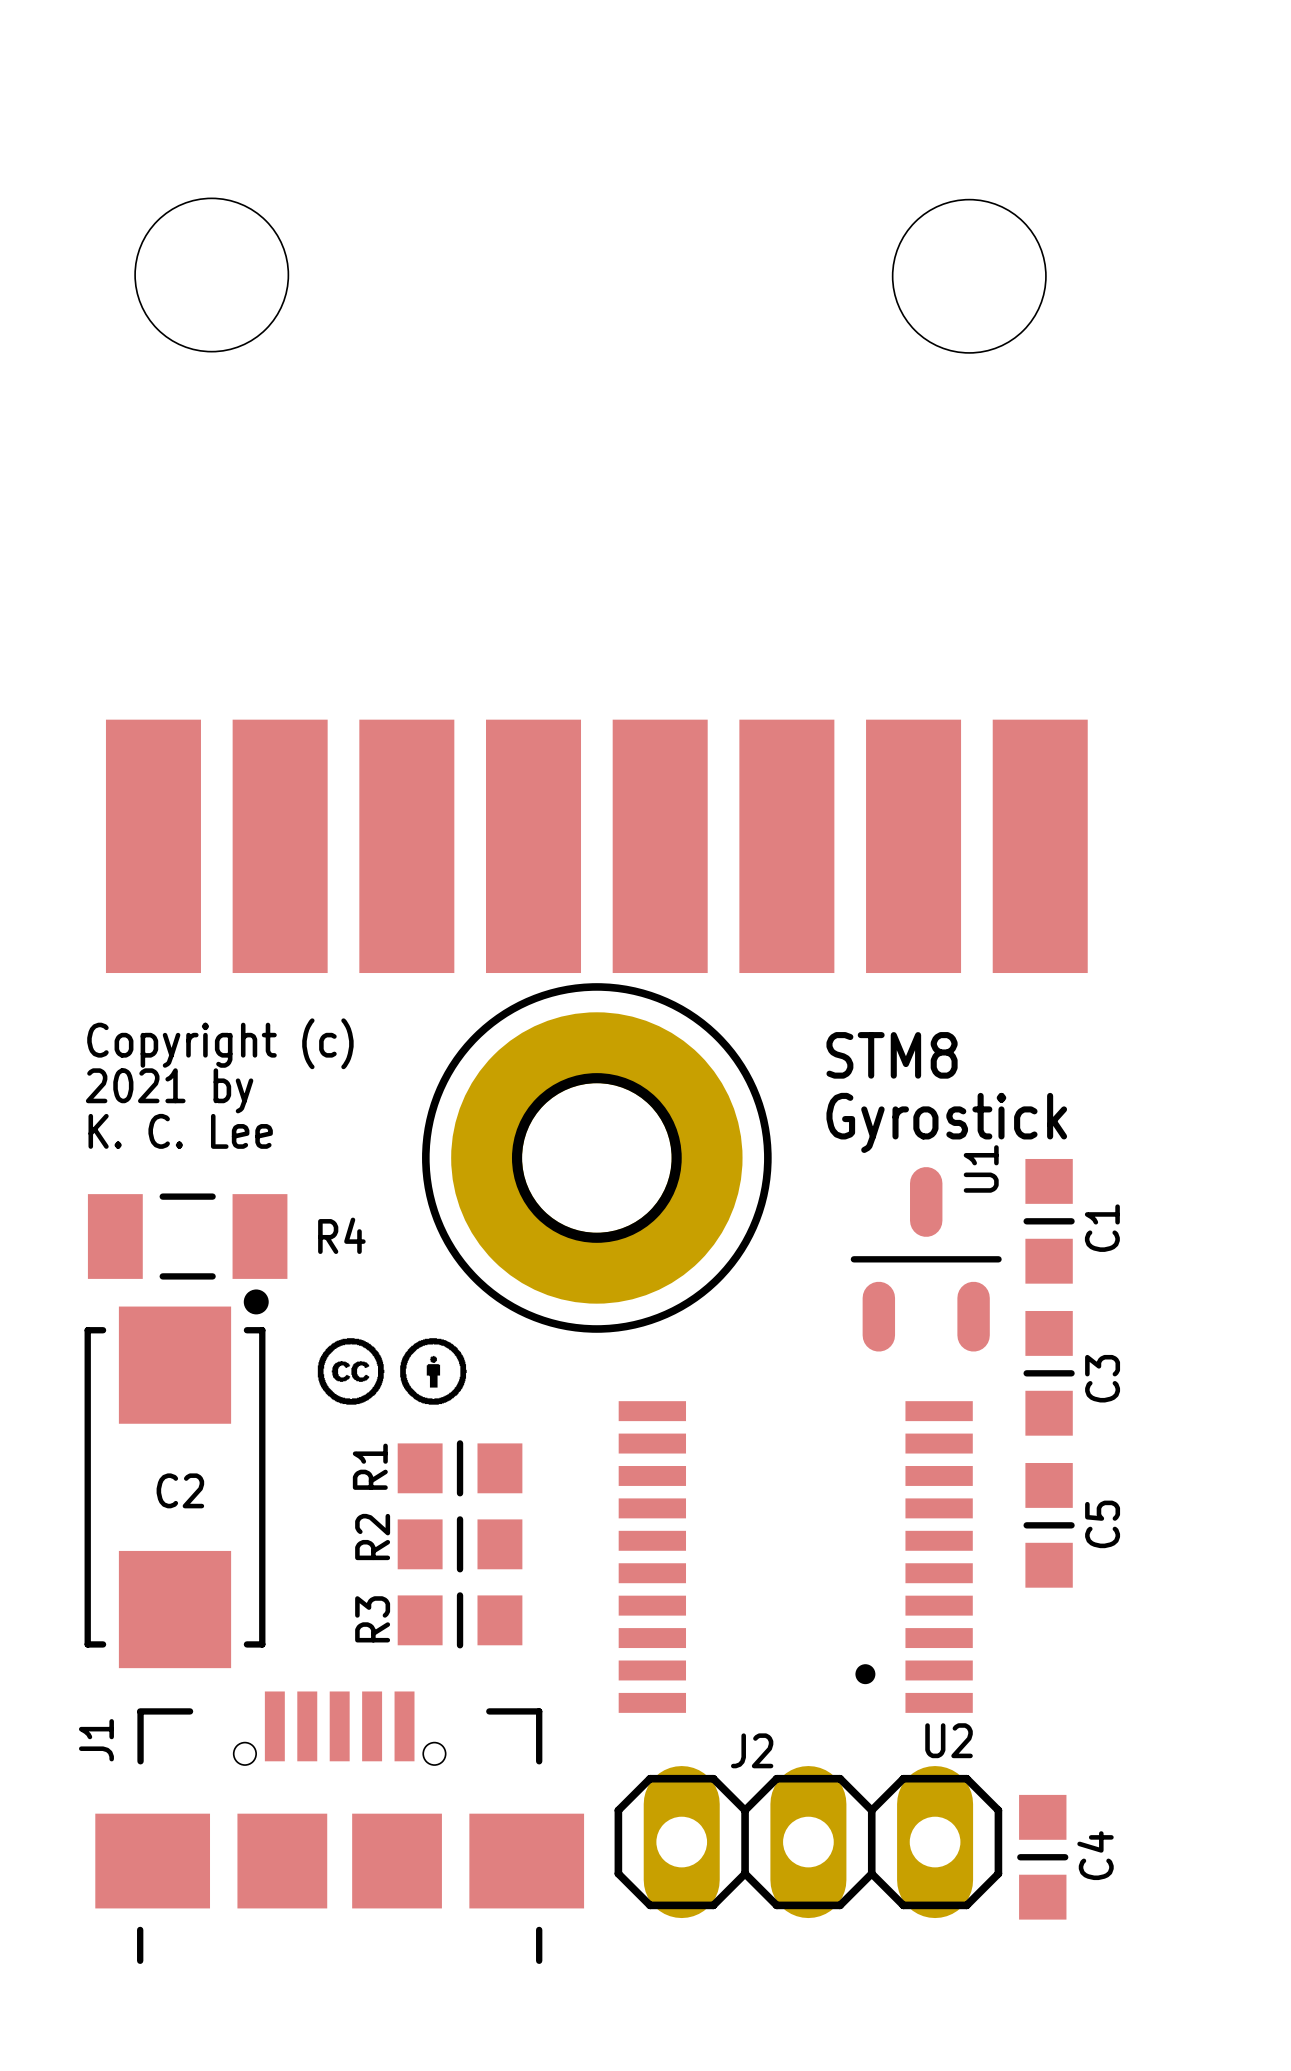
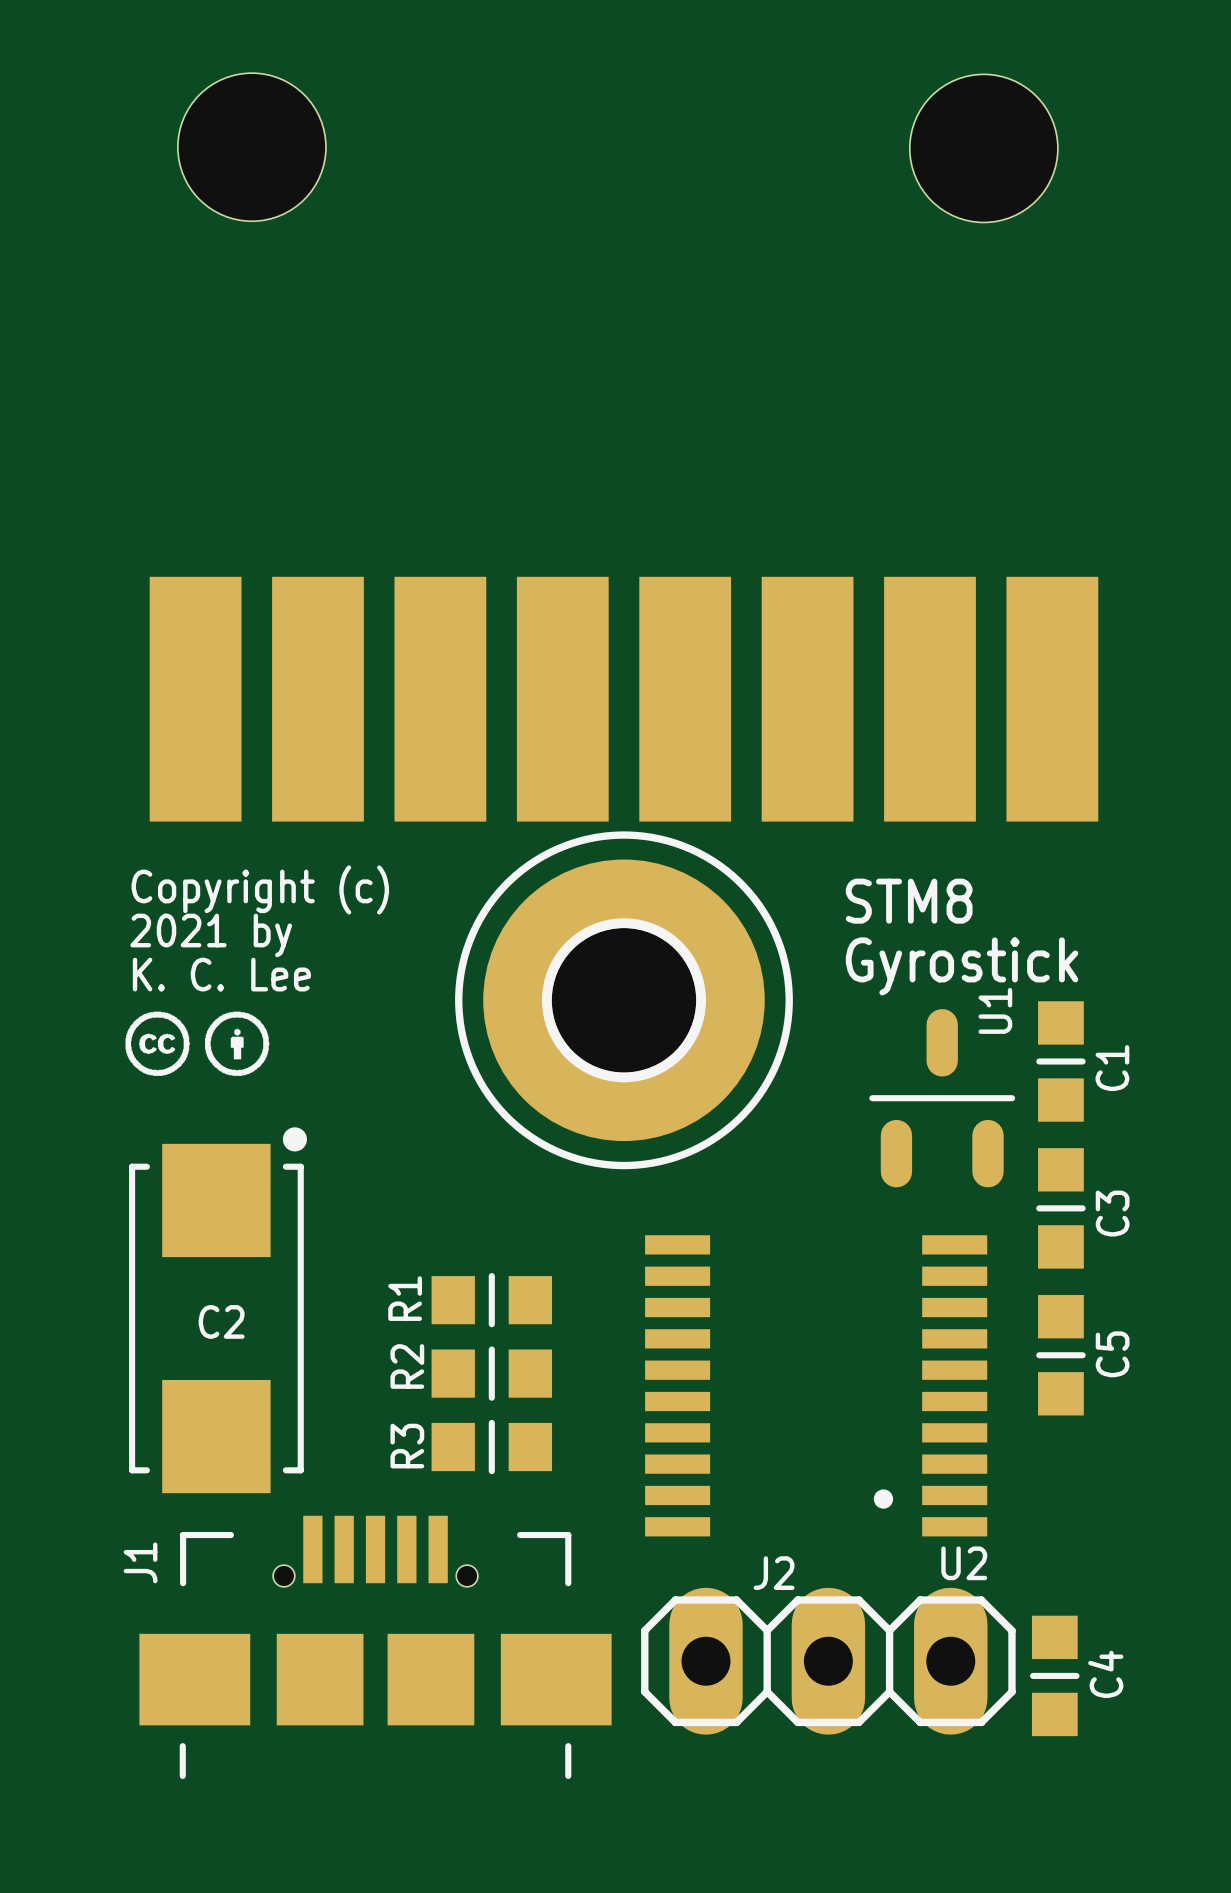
R4: (187, 1236) -> none
drawing position: (392, 1371) -> (197, 1043)

